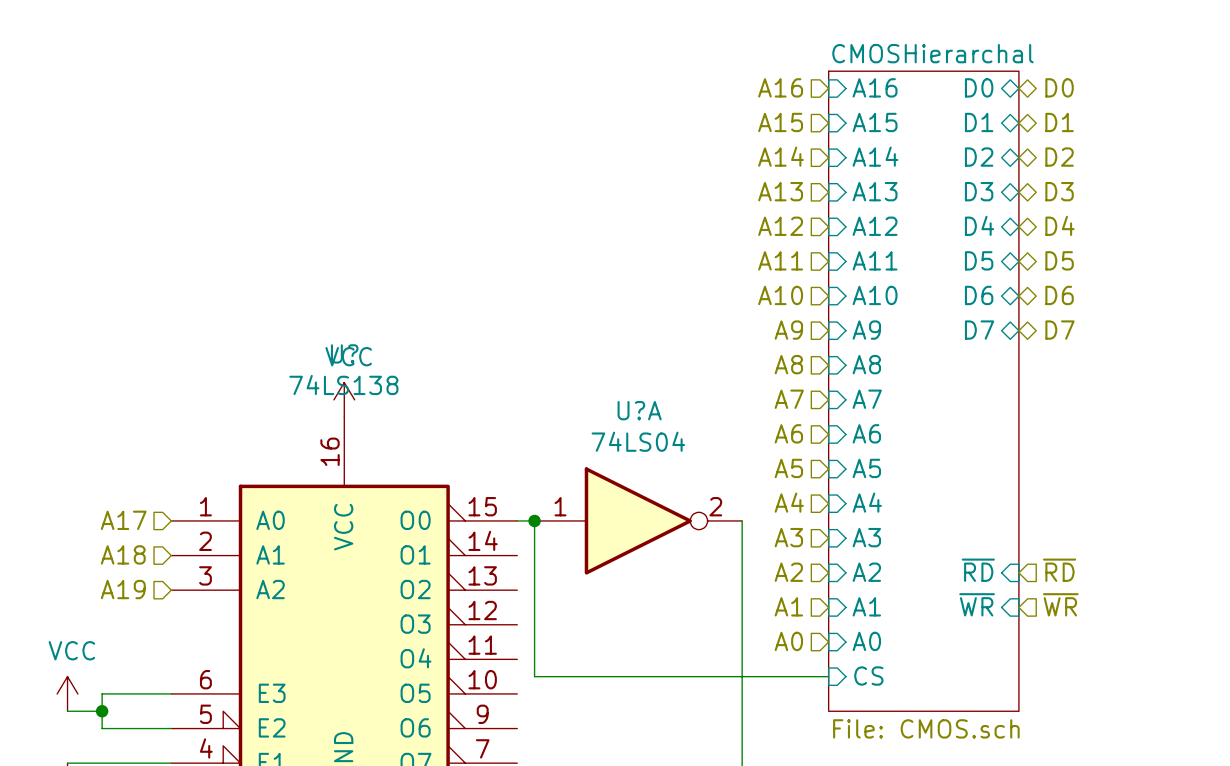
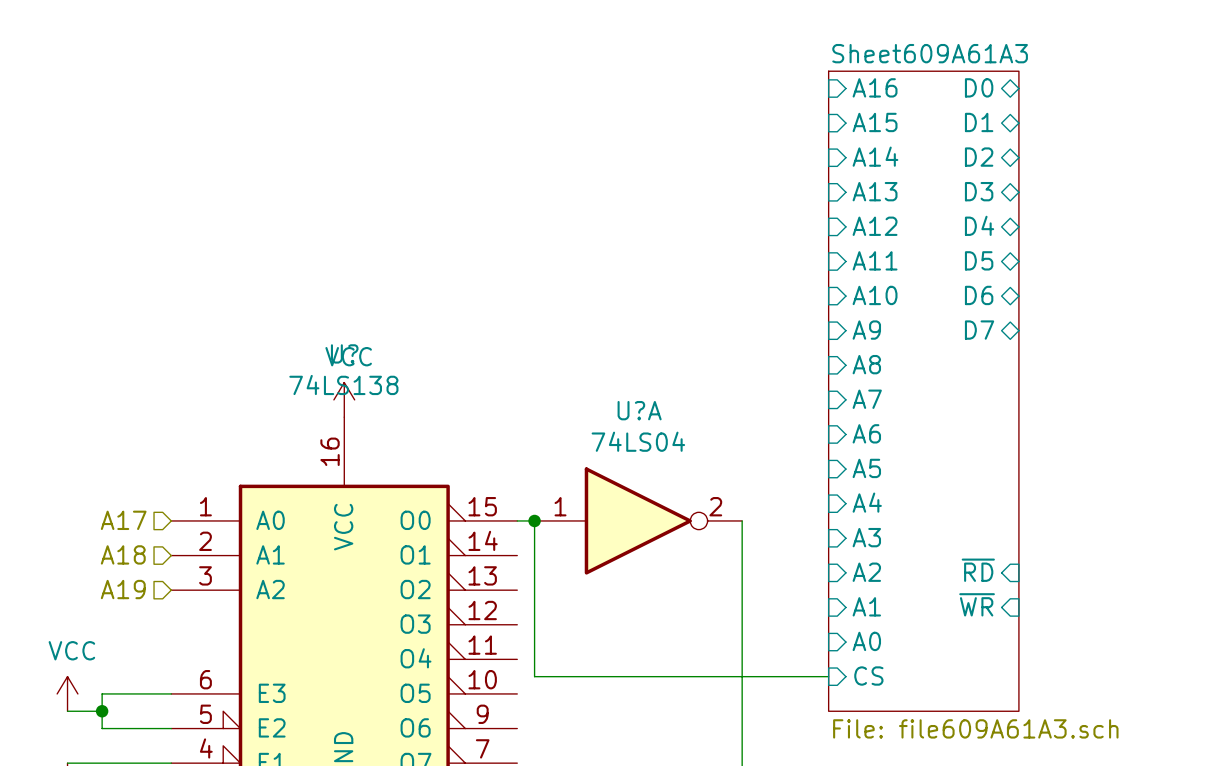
sheet CMOSHierarchal name: CMOSHierarchal (932, 53) -> Sheet609A61A3 (930, 53)
hierarchical label: A16 (780, 87) -> none
hierarchical label: D0 (1059, 87) -> none
hierarchical label: A15 (780, 122) -> none
hierarchical label: D1 (1059, 122) -> none
hierarchical label: A14 (781, 156) -> none
hierarchical label: D2 (1059, 157) -> none
hierarchical label: A13 (780, 191) -> none
hierarchical label: D3 (1059, 191) -> none
hierarchical label: D4 (1059, 225) -> none
hierarchical label: A12 (780, 226) -> none
hierarchical label: A11 (780, 260) -> none
hierarchical label: D5 (1059, 260) -> none
hierarchical label: A10 (780, 295) -> none
hierarchical label: D6 (1059, 295) -> none
hierarchical label: A9 (788, 330) -> none
hierarchical label: D7 (1059, 330) -> none
hierarchical label: A8 (788, 364) -> none
hierarchical label: A7 (789, 399) -> none
hierarchical label: A6 (788, 433) -> none
hierarchical label: A5 (788, 468) -> none
hierarchical label: A4 (789, 502) -> none
hierarchical label: A3 (788, 537) -> none
hierarchical label: ~{RD} (1059, 570) -> none
hierarchical label: A2 (788, 572) -> none
hierarchical label: ~{WR} (1060, 604) -> none
hierarchical label: A1 (788, 606) -> none
hierarchical label: A0 (788, 641) -> none
sheet CMOSHierarchal value: File: CMOS.sch (926, 728) -> File: file609A61A3.sch (975, 728)

